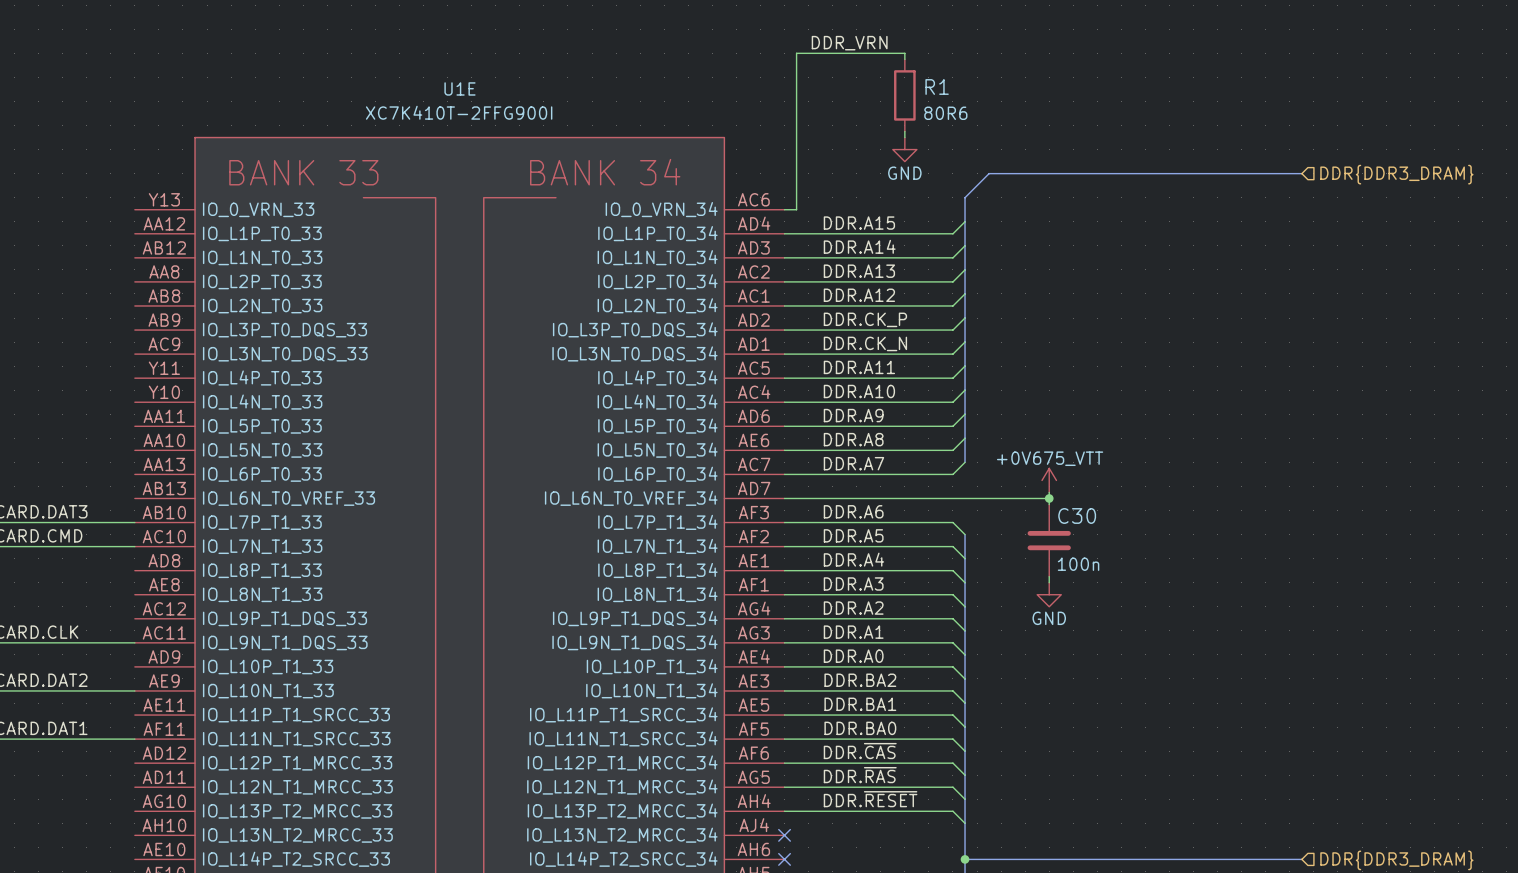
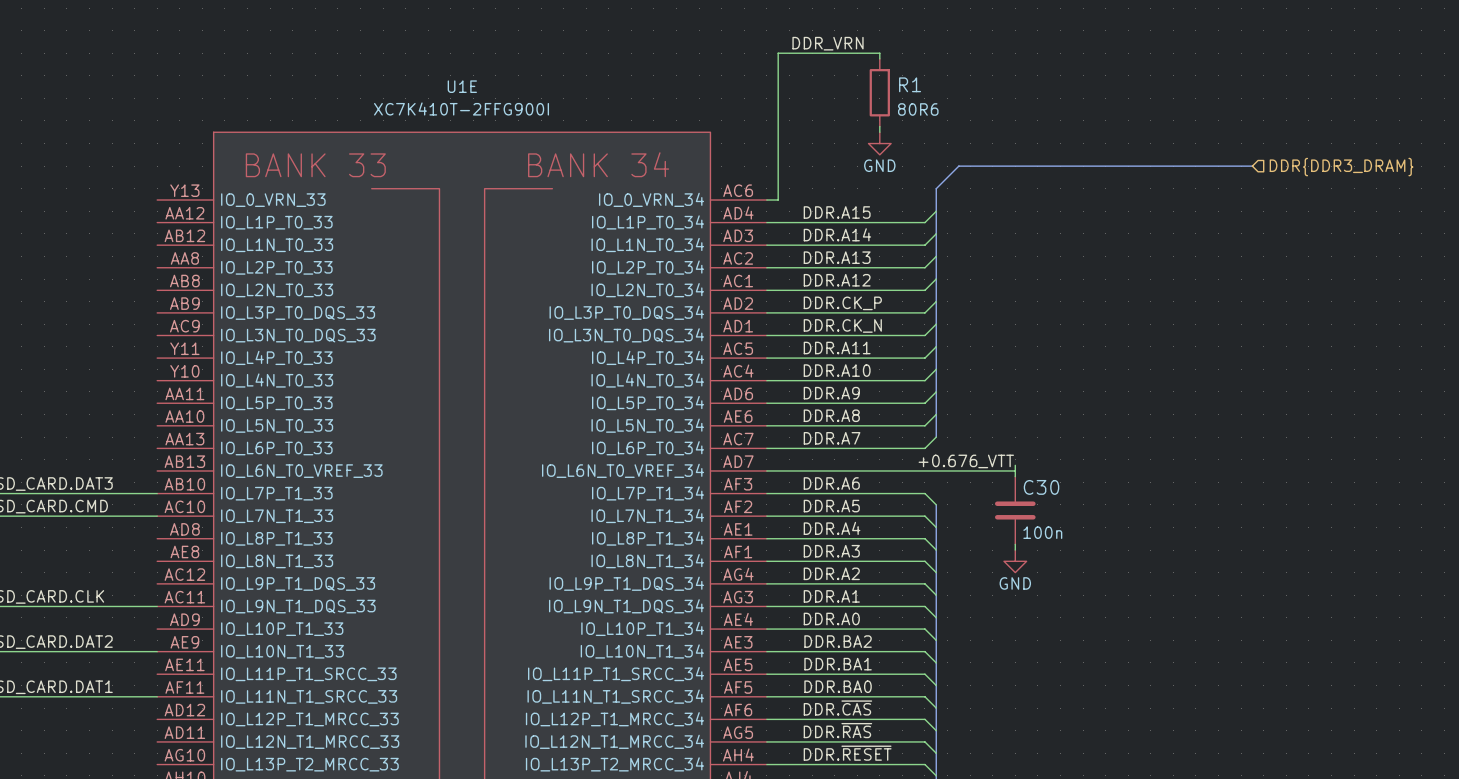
power symbol: +0V675_VTT (1049, 480) -> none
label: none -> +0.676_VTT (966, 461)
junction: (1049, 498) -> none

